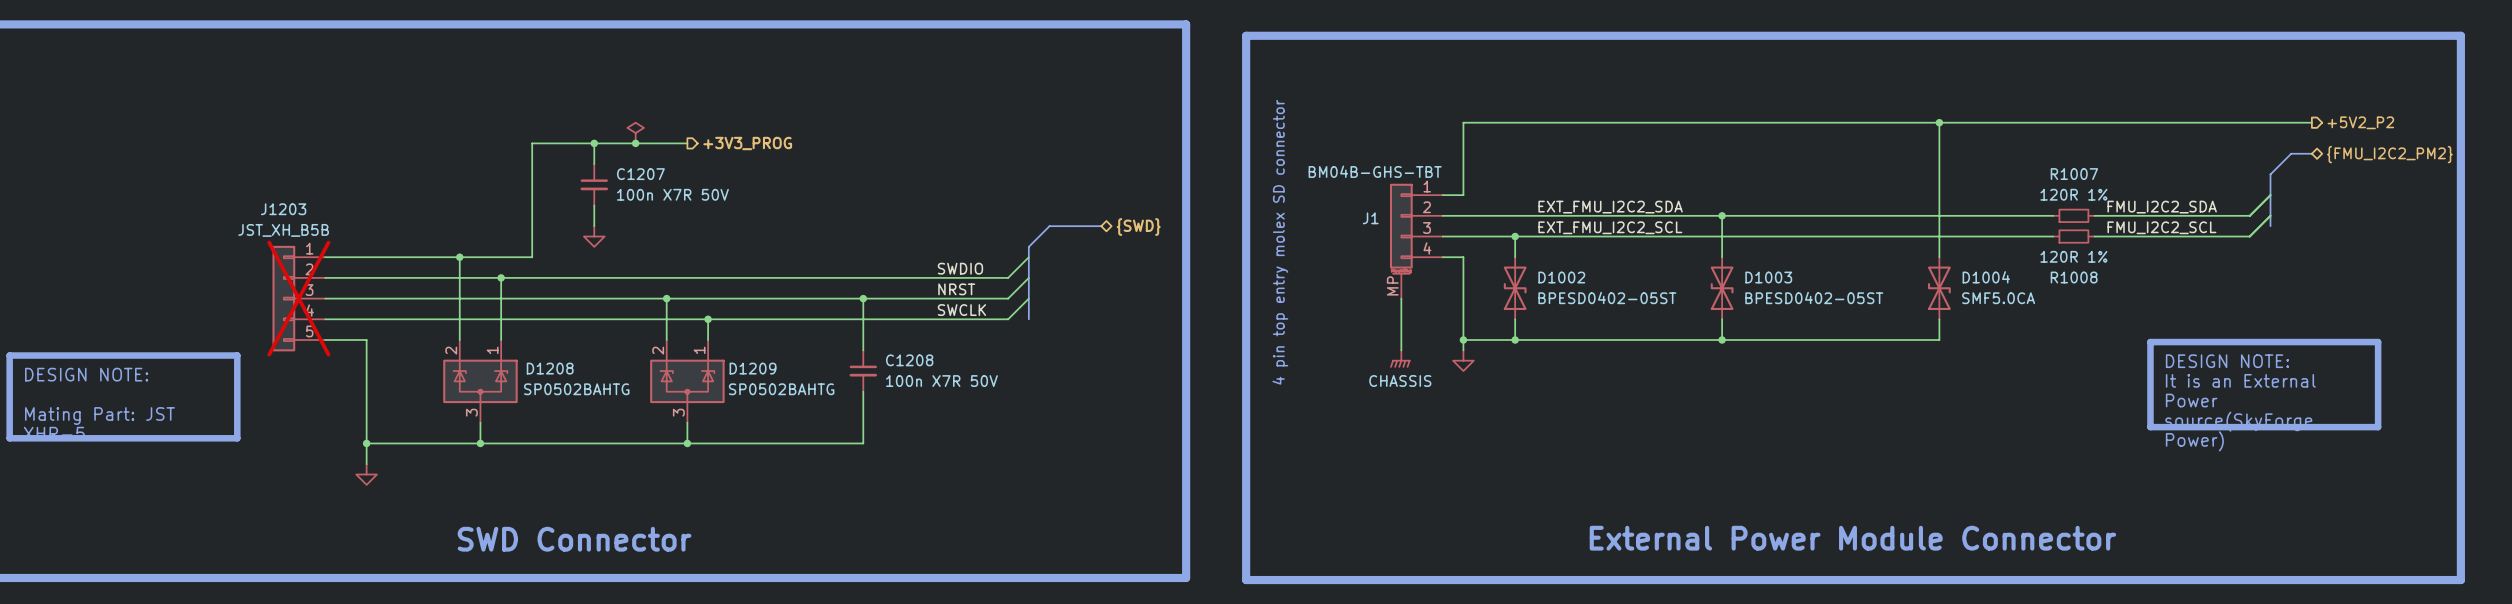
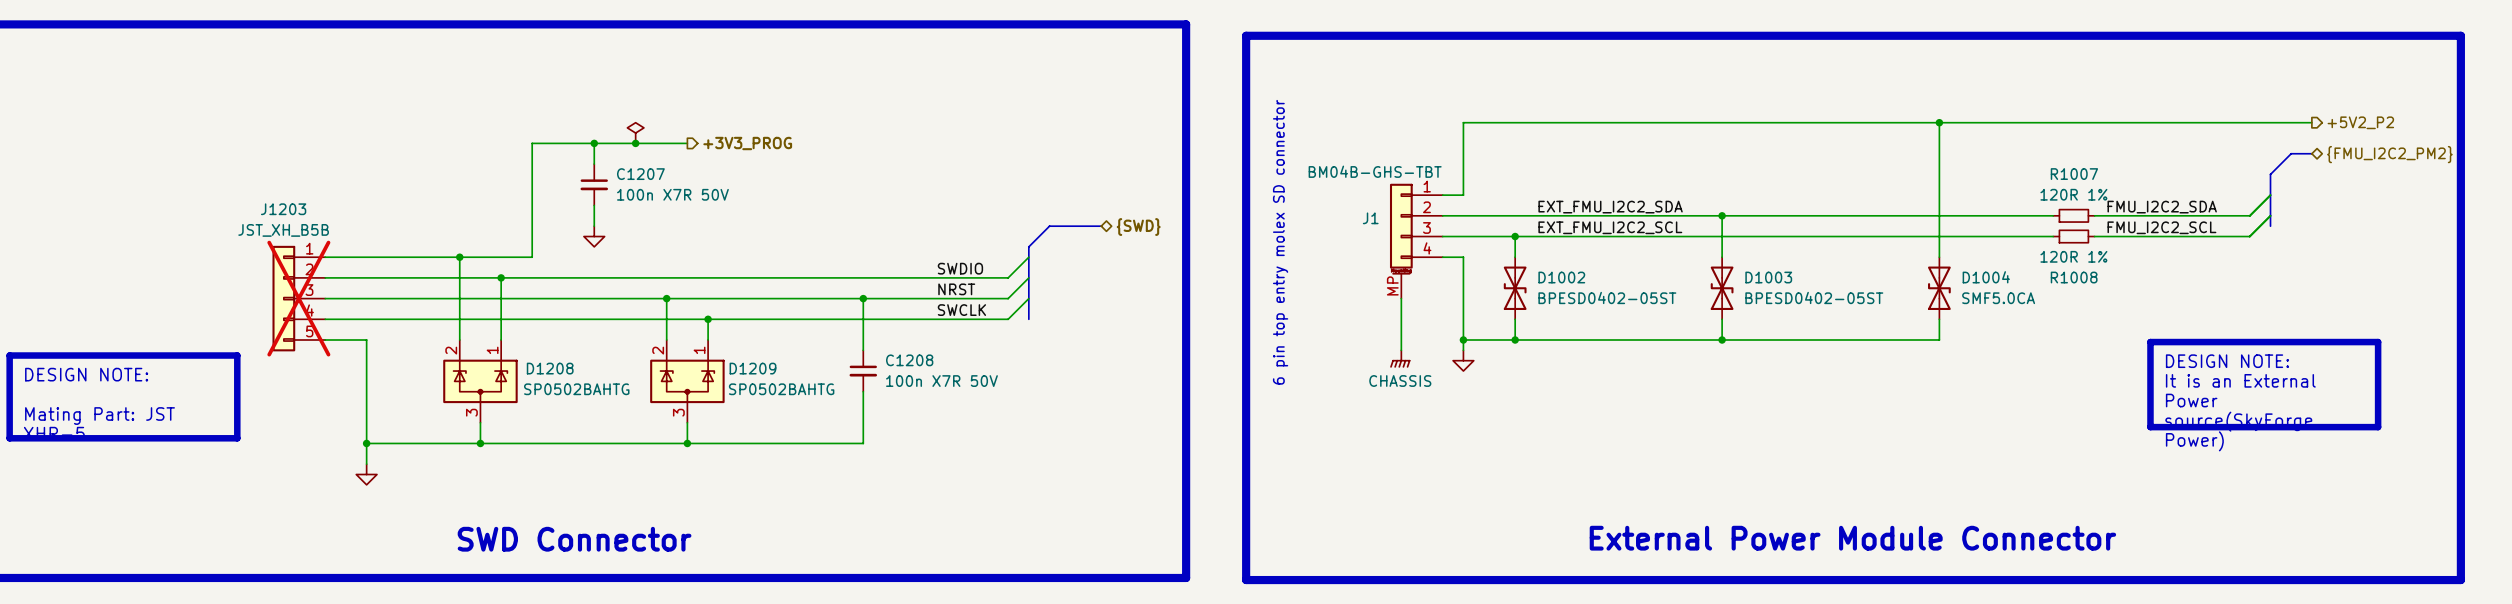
text: 4 pin top entry molex SD connector (1280, 242) -> 6 pin top entry molex SD connector (1280, 242)

